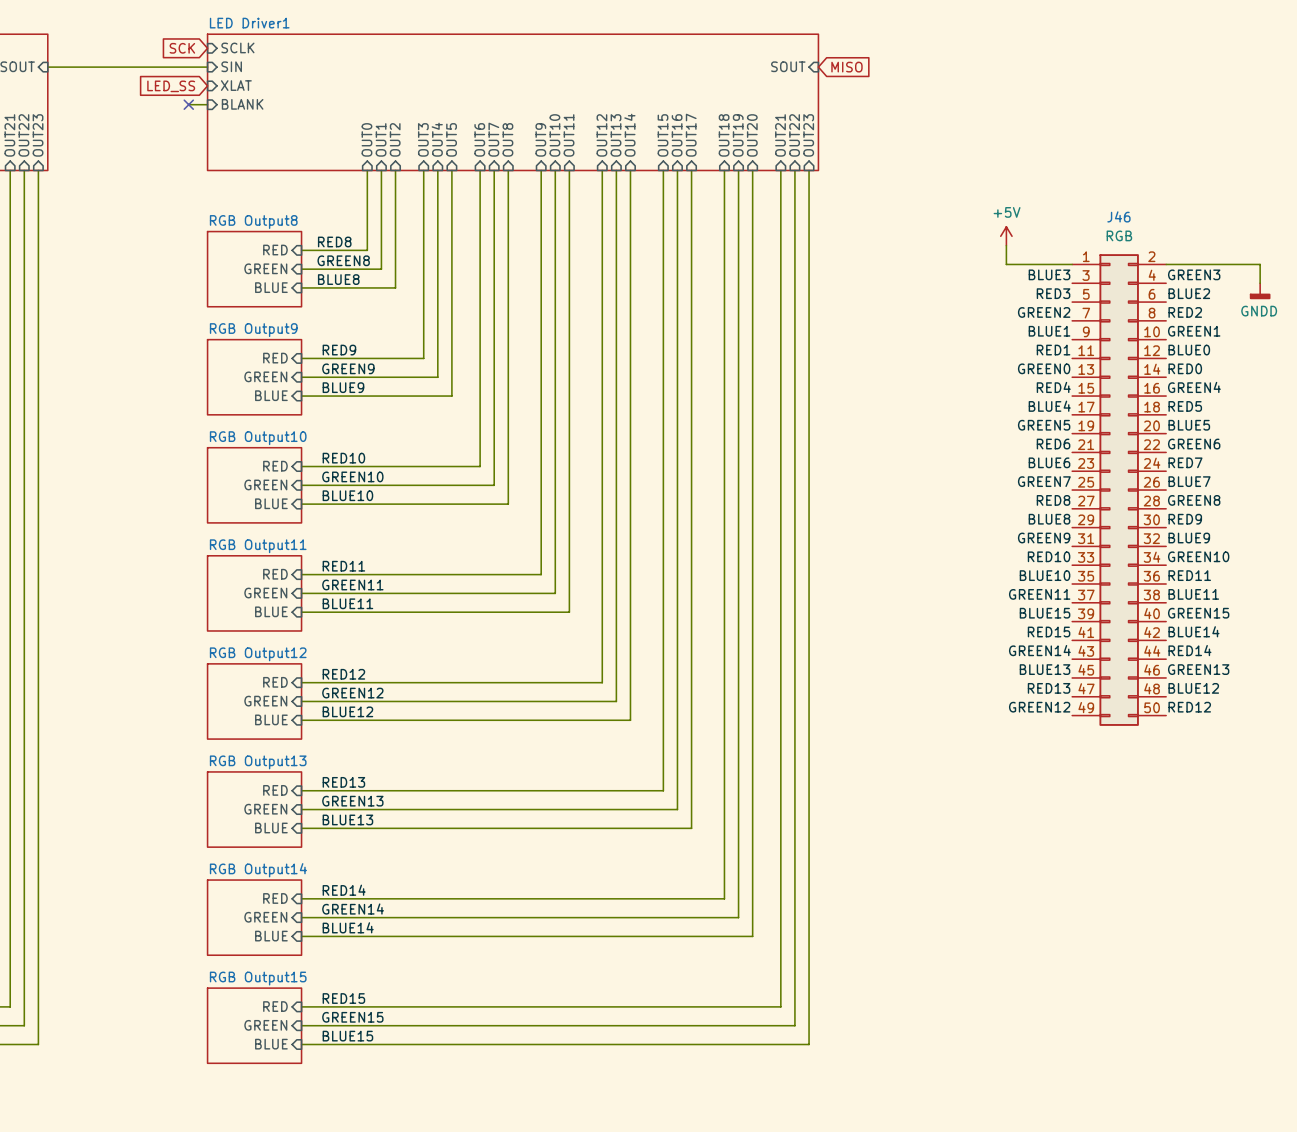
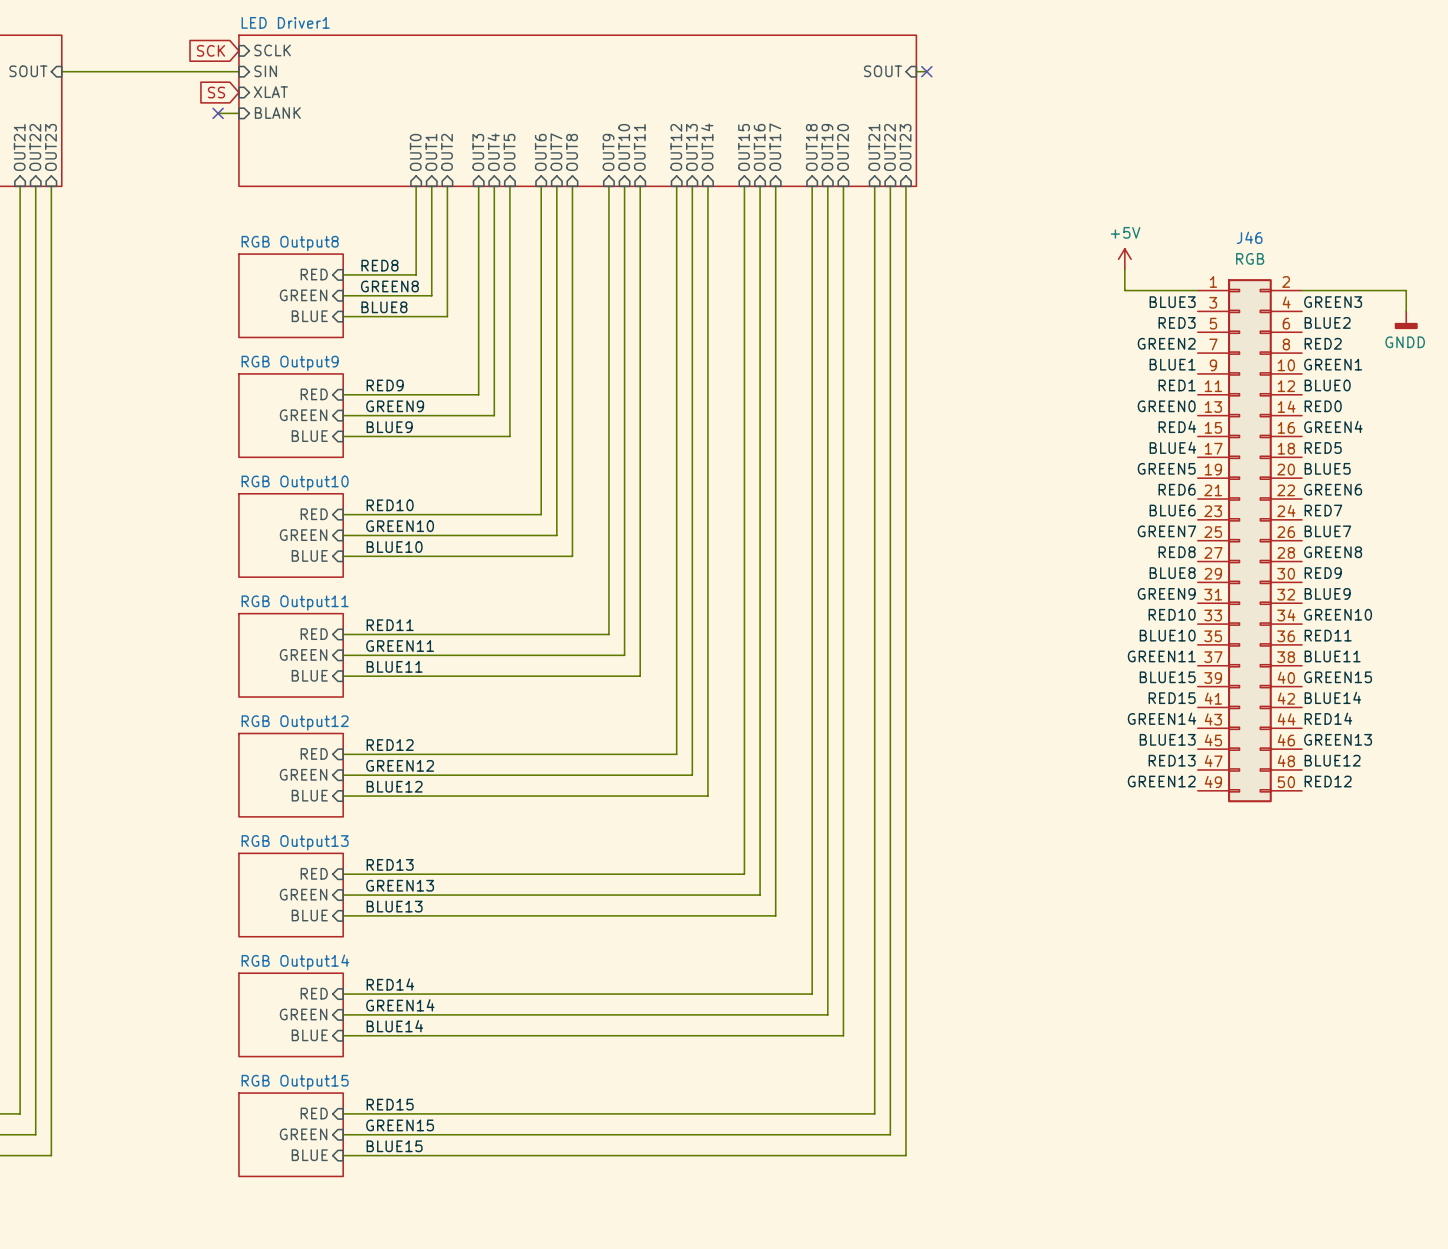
wire: none -> (916, 71) (926, 71)
no-connect mark: none -> (926, 71)
global label: MISO (846, 67) -> none
global label: LED_SS (171, 86) -> SS (216, 92)

